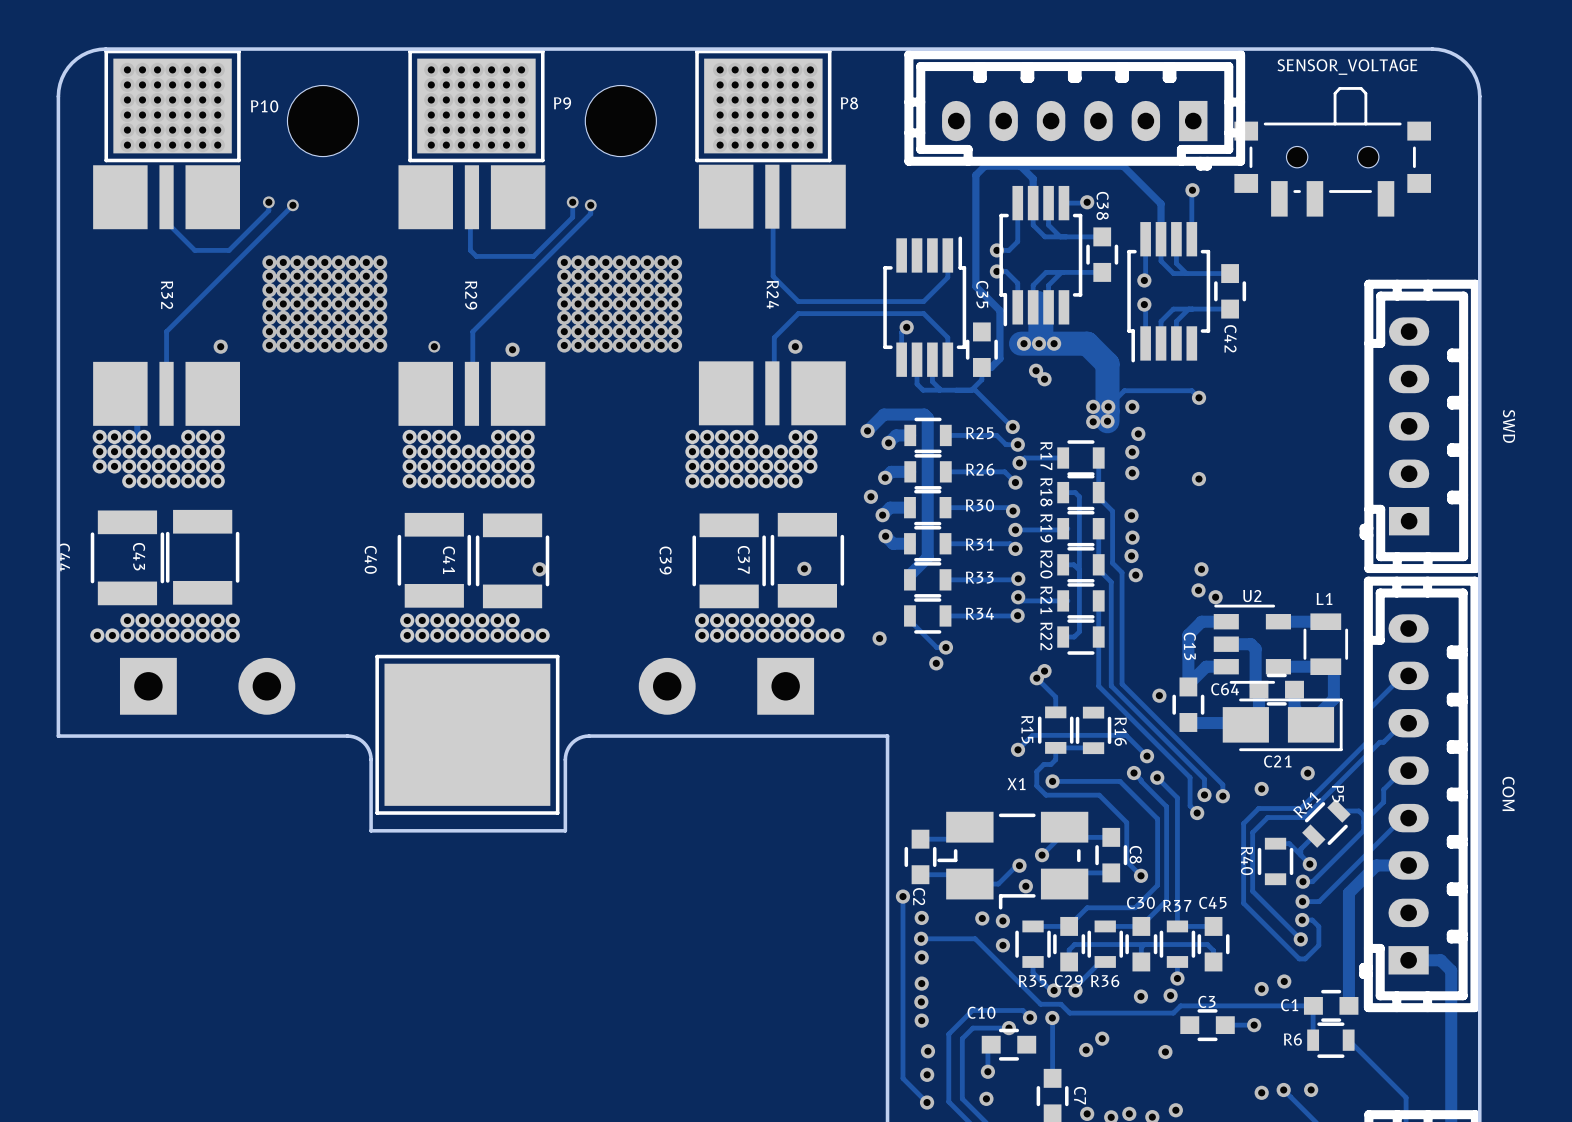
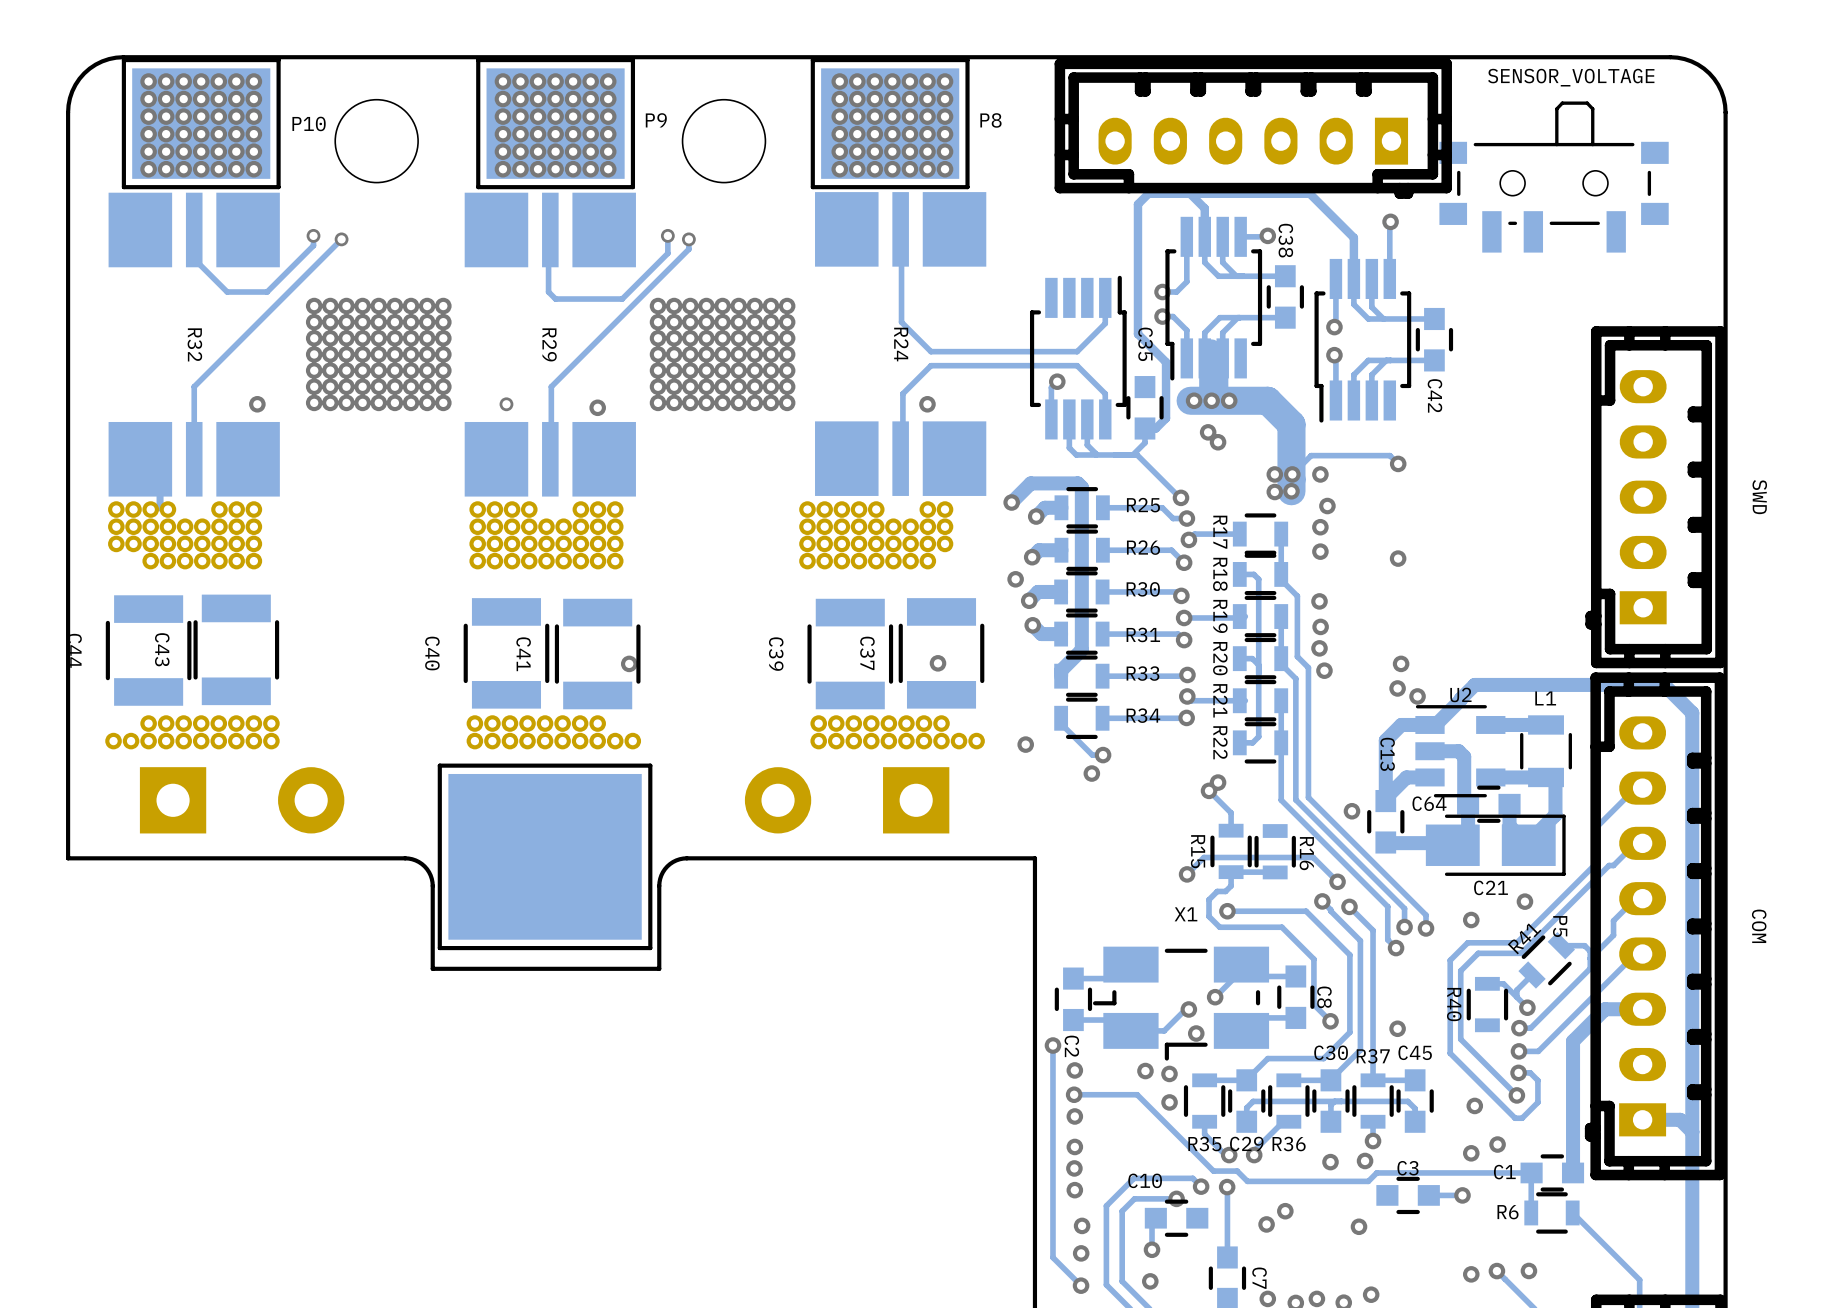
track: none -> (1430, 724) (1435, 724) (1474, 684) (1664, 684) (1692, 713) (1692, 1131)
via: none -> (1397, 1028)
via: none -> (1474, 1105)

